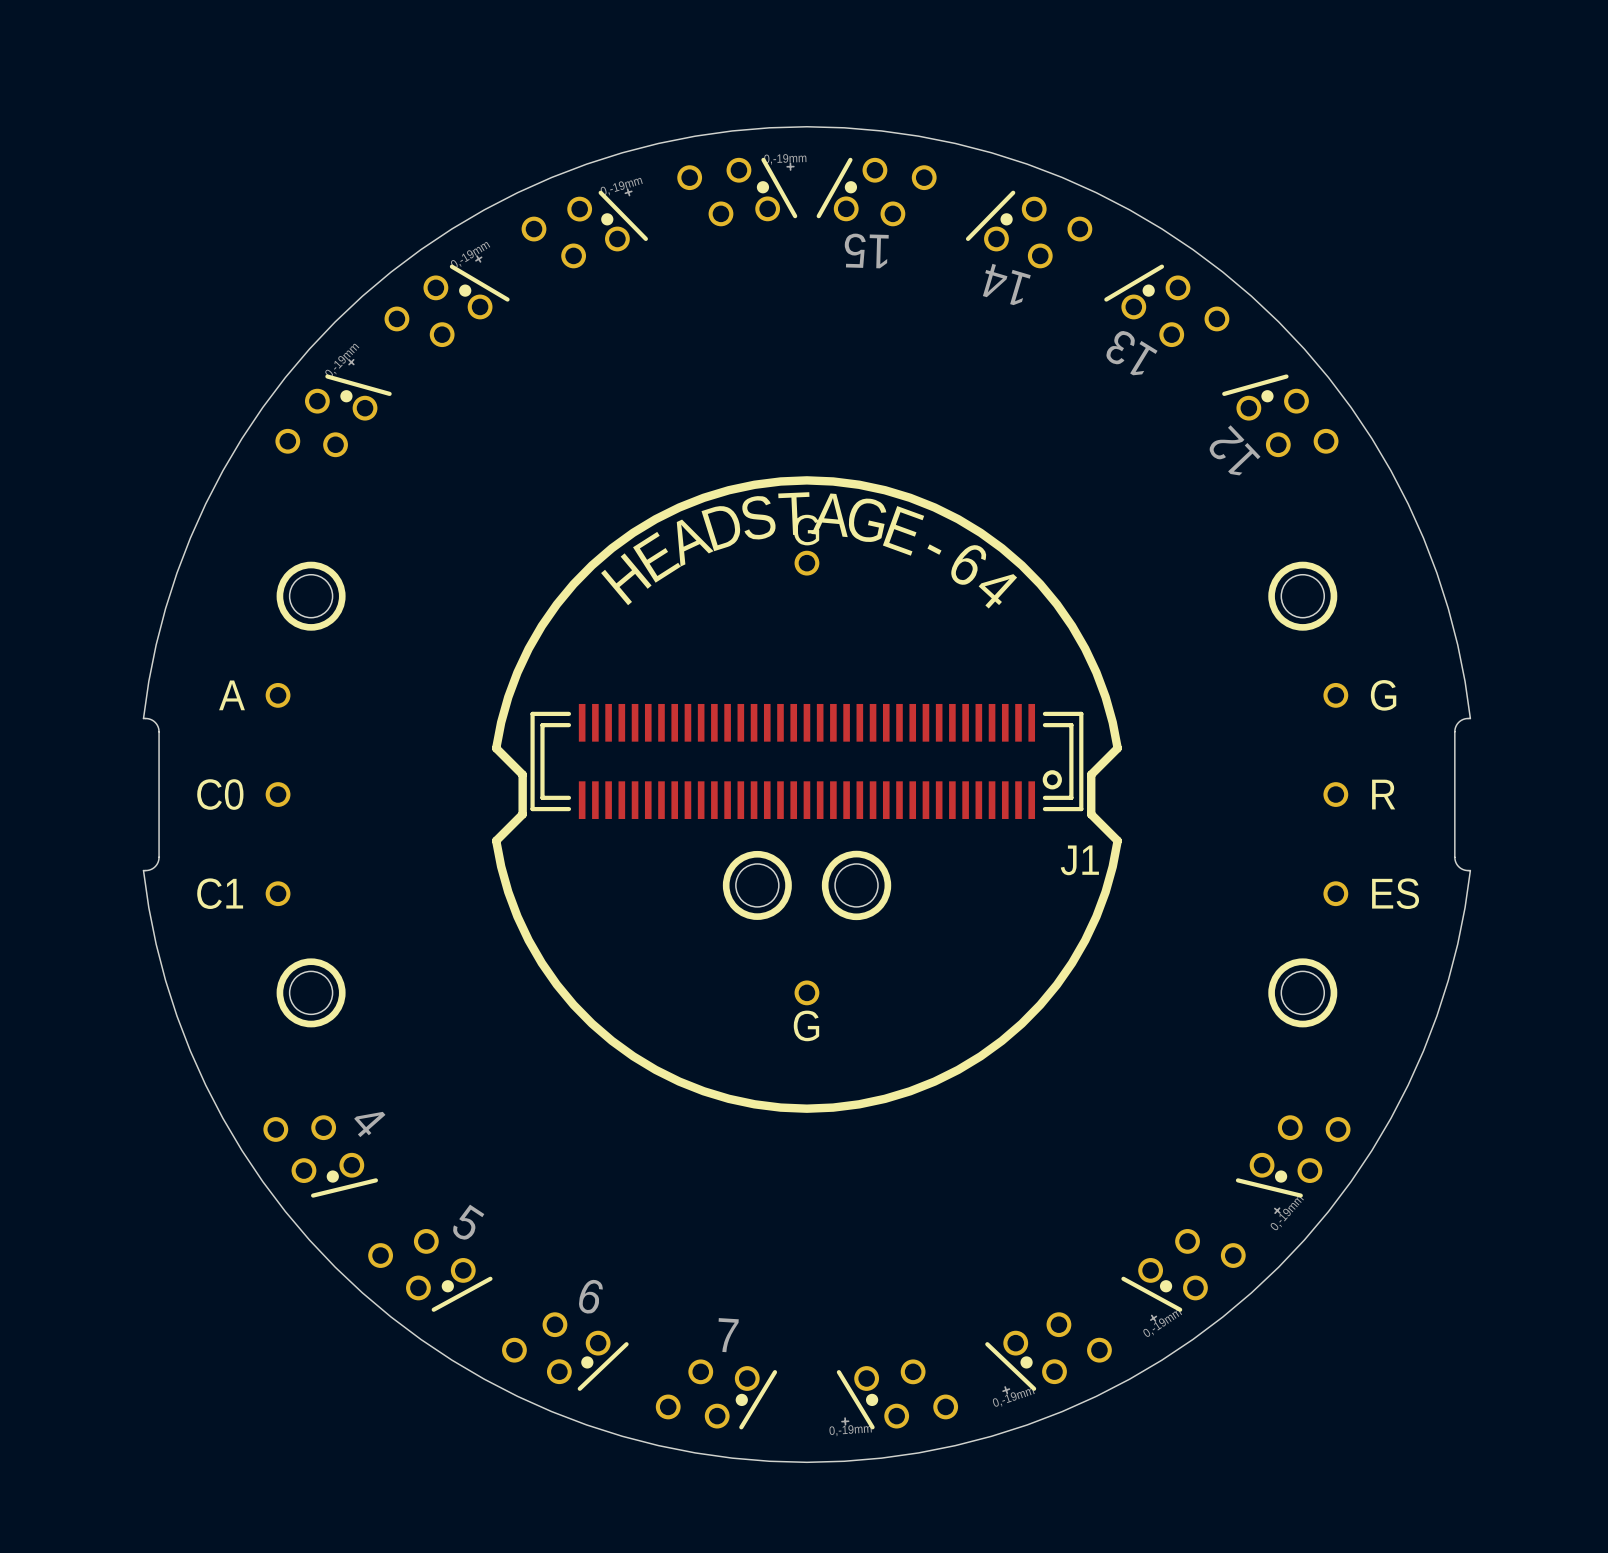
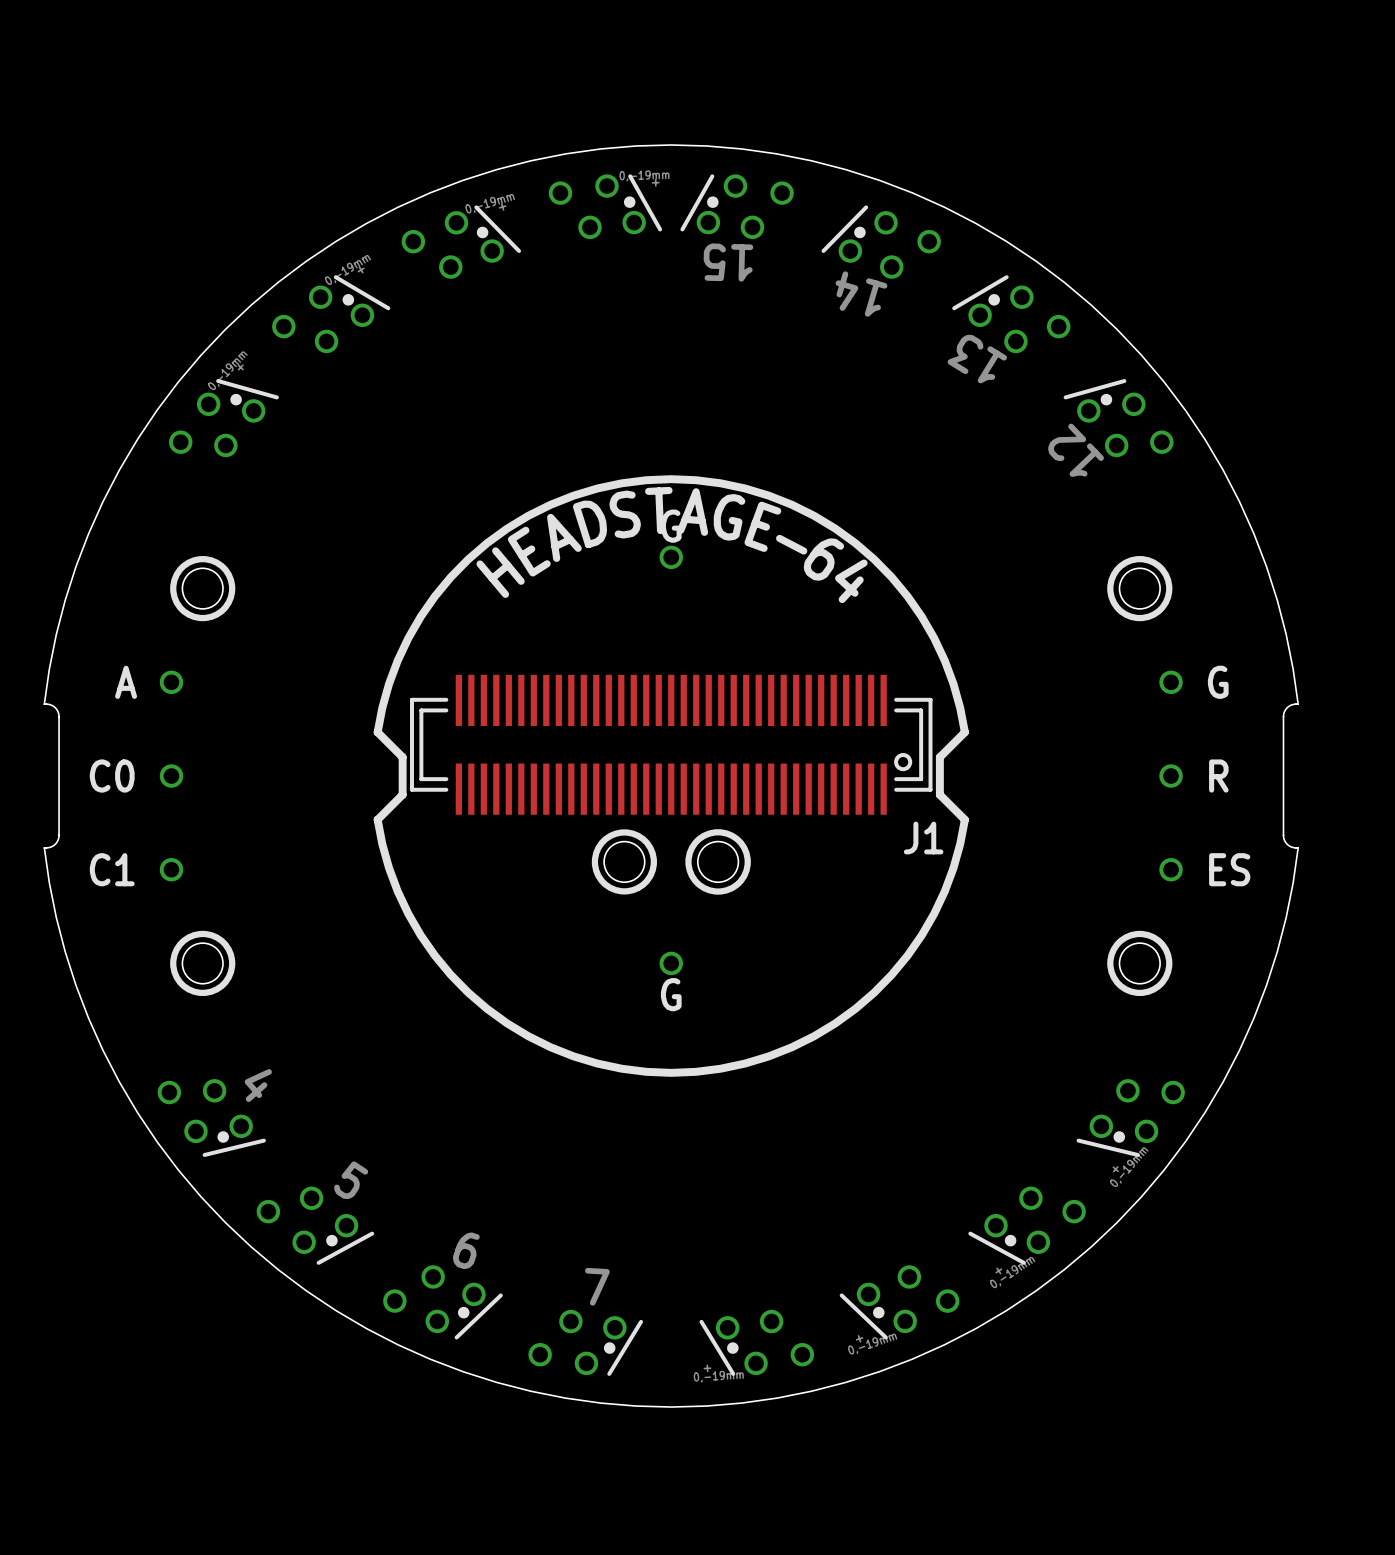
J1 footprint: [530, 703, 1084, 820] -> [410, 674, 933, 815]

